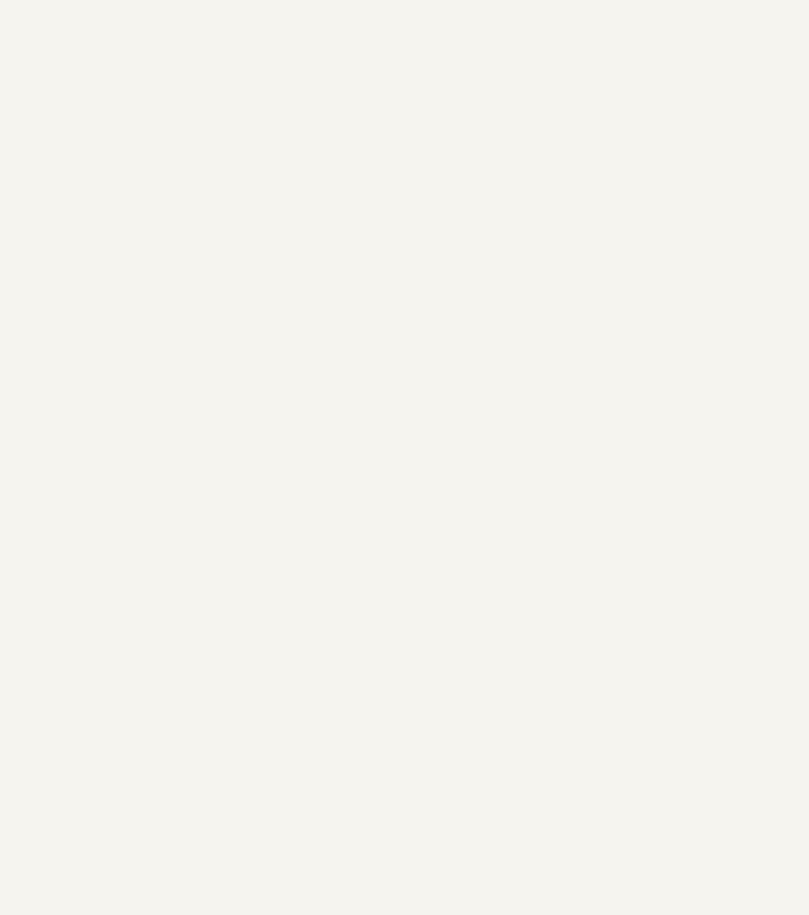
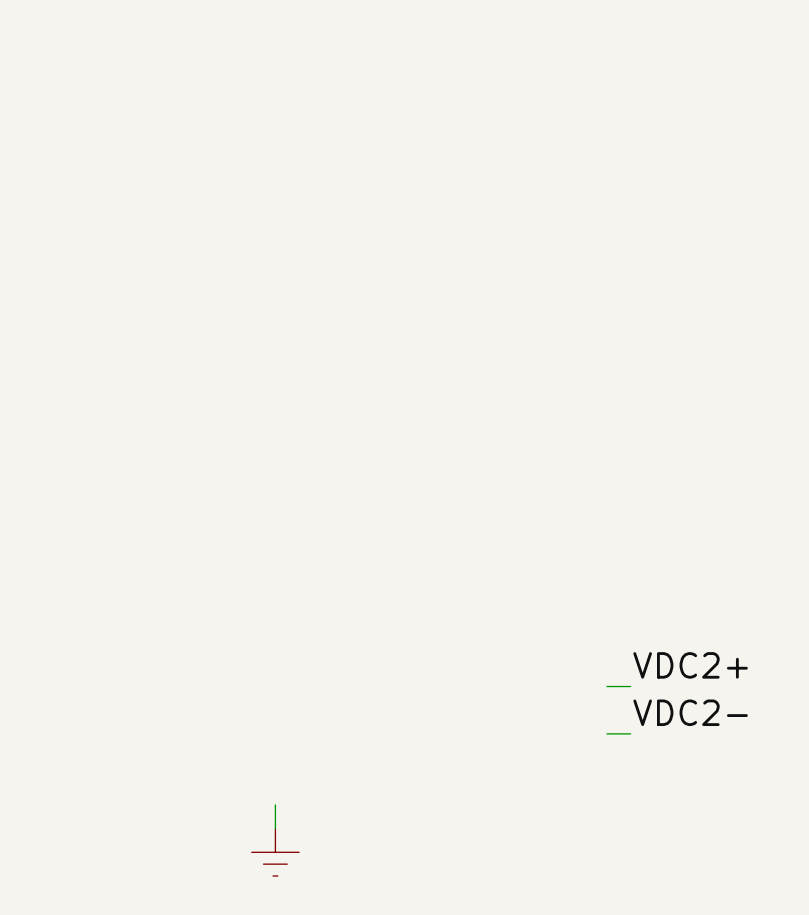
label: none -> VDC2+ (690, 665)
wire: none -> (606, 686) (630, 686)
label: none -> VDC2- (690, 712)
wire: none -> (606, 733) (630, 733)
wire: none -> (275, 804) (275, 828)
power symbol: none -> (275, 852)

